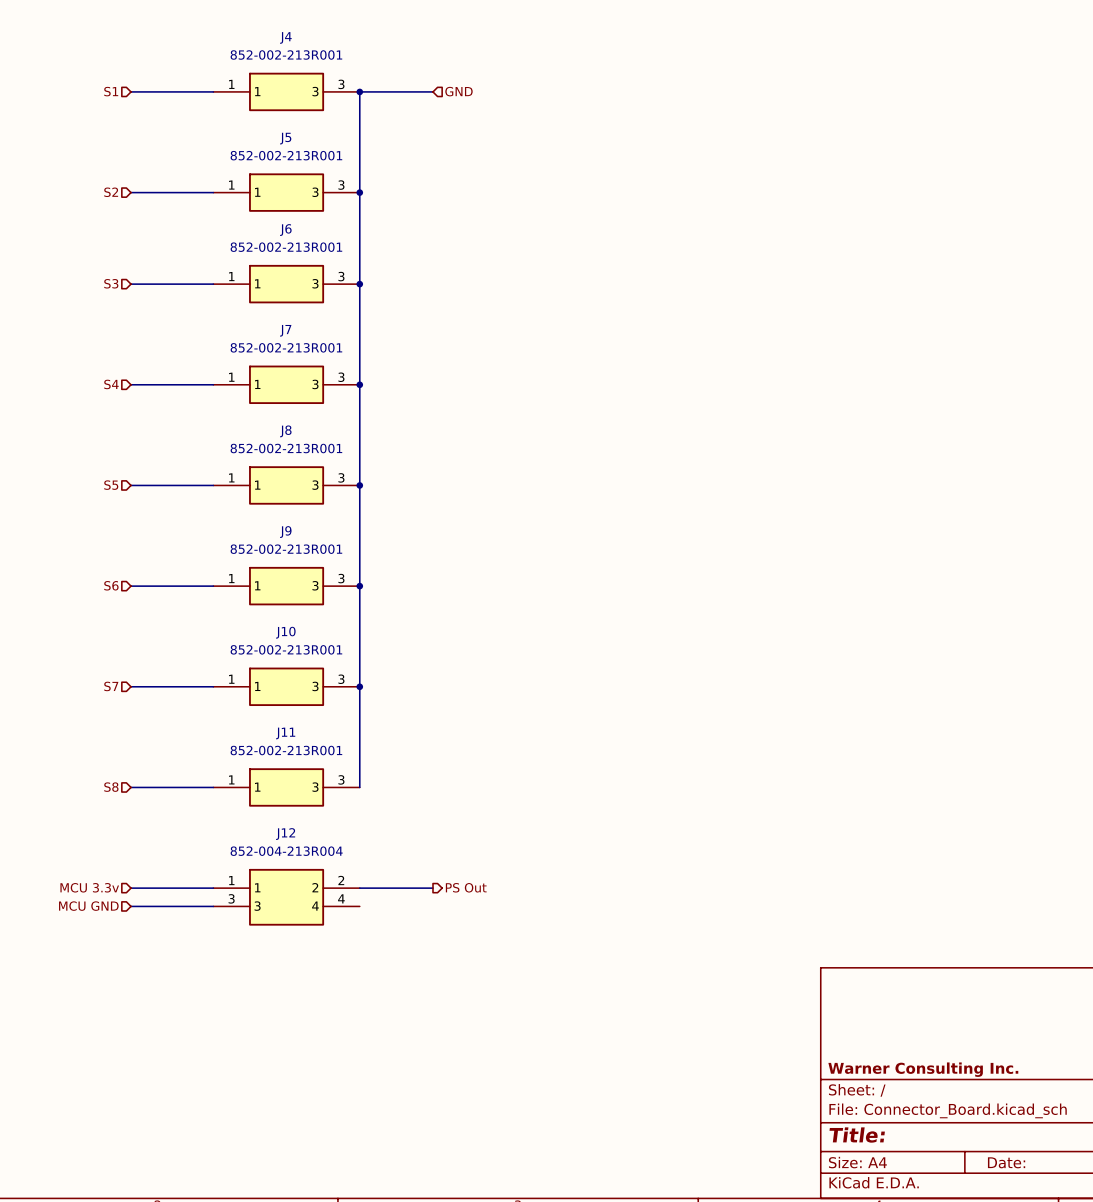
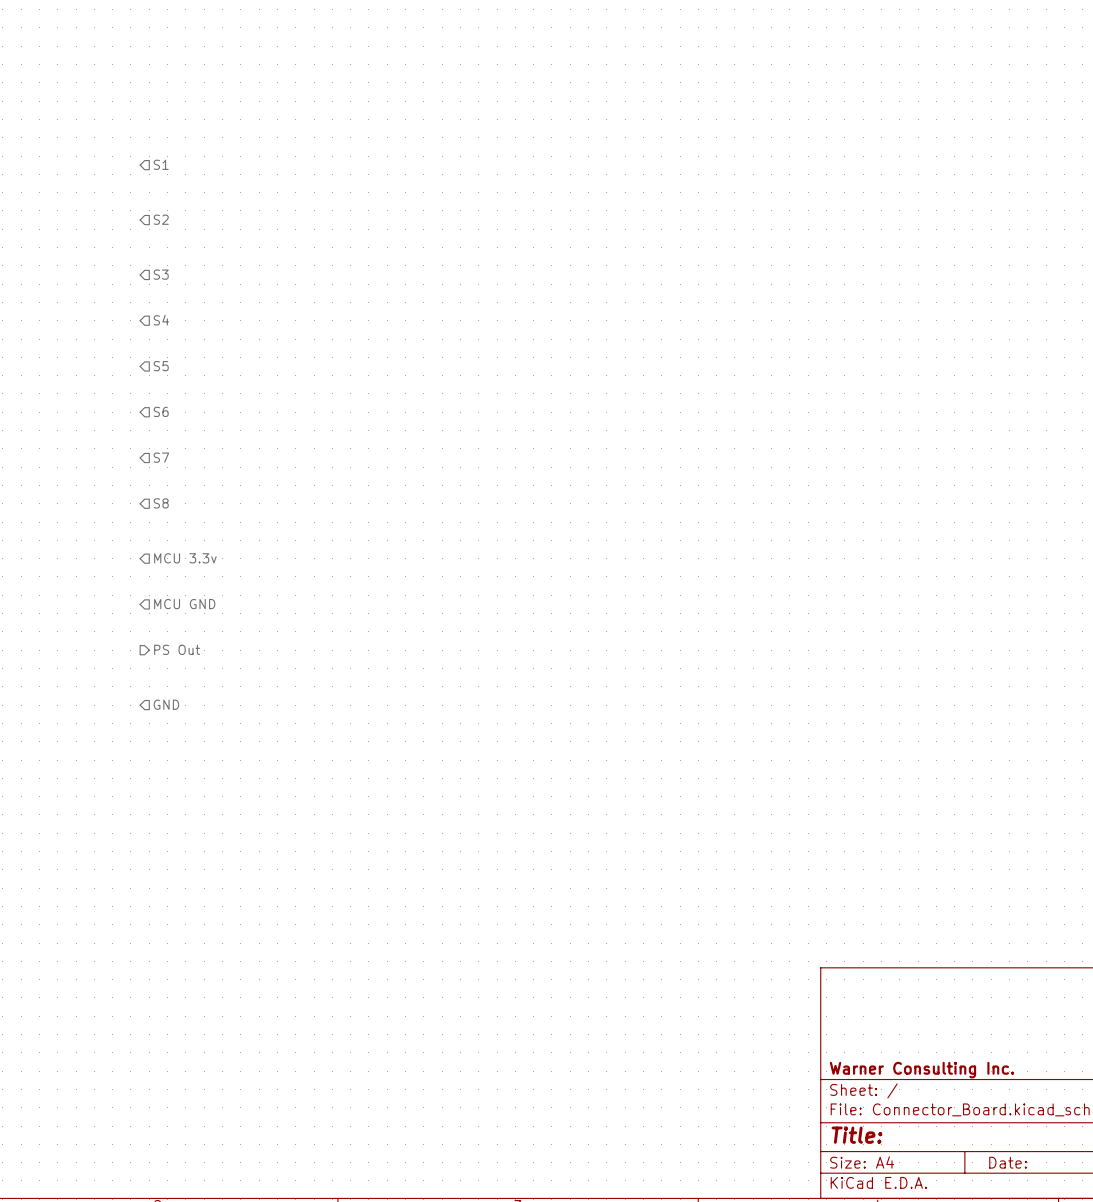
hierarchical label rotation: 0° (111, 91) -> 180° (161, 164)
hierarchical label position: S1 (111, 91) -> S1 (161, 164)
wire: (130, 91) (213, 91) -> none
J4: 852-002-213R001 (286, 91) -> none
junction: (359, 91) -> none
wire: (432, 91) (359, 91) (359, 787) -> none
hierarchical label: GND (458, 91) -> none
hierarchical label rotation: 0° (111, 192) -> 180° (161, 219)
hierarchical label position: S2 (111, 192) -> S2 (161, 219)
wire: (130, 192) (213, 192) -> none
J5: 852-002-213R001 (286, 192) -> none
junction: (359, 192) -> none
hierarchical label rotation: 0° (111, 283) -> 180° (161, 274)
hierarchical label position: S3 (111, 283) -> S3 (161, 274)
wire: (130, 284) (213, 284) -> none
J6: 852-002-213R001 (286, 284) -> none
junction: (359, 284) -> none
hierarchical label rotation: 0° (111, 384) -> 180° (161, 320)
hierarchical label position: S4 (111, 384) -> S4 (161, 320)
wire: (130, 384) (213, 384) -> none
J7: 852-002-213R001 (286, 384) -> none
junction: (359, 384) -> none
hierarchical label: none -> S7 (161, 457)
hierarchical label rotation: 0° (111, 485) -> 180° (161, 366)
hierarchical label position: S5 (111, 485) -> S5 (161, 366)
wire: (130, 485) (213, 485) -> none
J8: 852-002-213R001 (286, 485) -> none
junction: (359, 485) -> none
hierarchical label: none -> S8 (161, 503)
hierarchical label: none -> MCU 3.3v (185, 558)
hierarchical label rotation: 0° (111, 585) -> 180° (161, 411)
hierarchical label position: S6 (111, 585) -> S6 (161, 411)
wire: (130, 586) (213, 586) -> none
J9: 852-002-213R001 (286, 586) -> none
junction: (359, 586) -> none
hierarchical label: none -> MCU GND (184, 604)
hierarchical label: none -> PS Out (177, 649)
hierarchical label: S7 (111, 686) -> none
wire: (130, 686) (213, 686) -> none
J10: 852-002-213R001 (286, 686) -> none
junction: (359, 686) -> none
hierarchical label: none -> GND (166, 704)
hierarchical label: S8 (111, 787) -> none
wire: (130, 787) (213, 787) -> none
J11: 852-002-213R001 (286, 787) -> none
hierarchical label: MCU 3.3v (89, 887) -> none
hierarchical label: PS Out (466, 887) -> none
wire: (130, 888) (213, 888) -> none
wire: (359, 888) (432, 888) -> none
J12: 852-004-213R004 (286, 897) -> none
hierarchical label: MCU GND (88, 906) -> none
wire: (130, 906) (213, 906) -> none

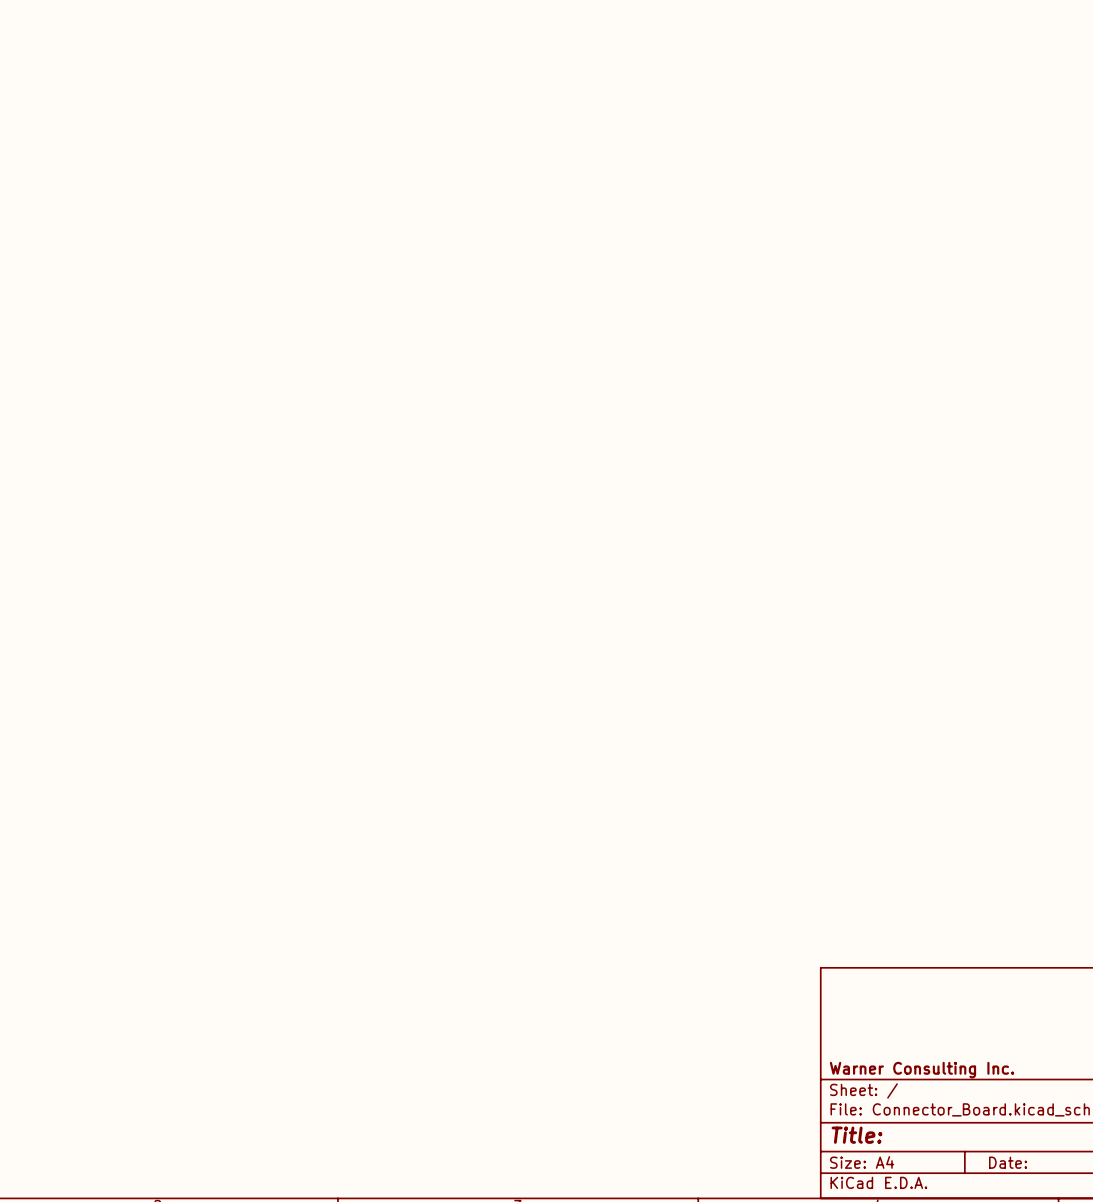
hierarchical label: S1 (161, 164) -> none
hierarchical label: S2 (161, 219) -> none
hierarchical label: S3 (161, 274) -> none
hierarchical label: S4 (161, 320) -> none
hierarchical label: S5 (161, 366) -> none
hierarchical label: S6 (161, 411) -> none
hierarchical label: S7 (161, 457) -> none
hierarchical label: S8 (161, 503) -> none
hierarchical label: MCU 3.3v (185, 558) -> none
hierarchical label: MCU GND (184, 604) -> none
hierarchical label: PS Out (177, 649) -> none
hierarchical label: GND (166, 704) -> none

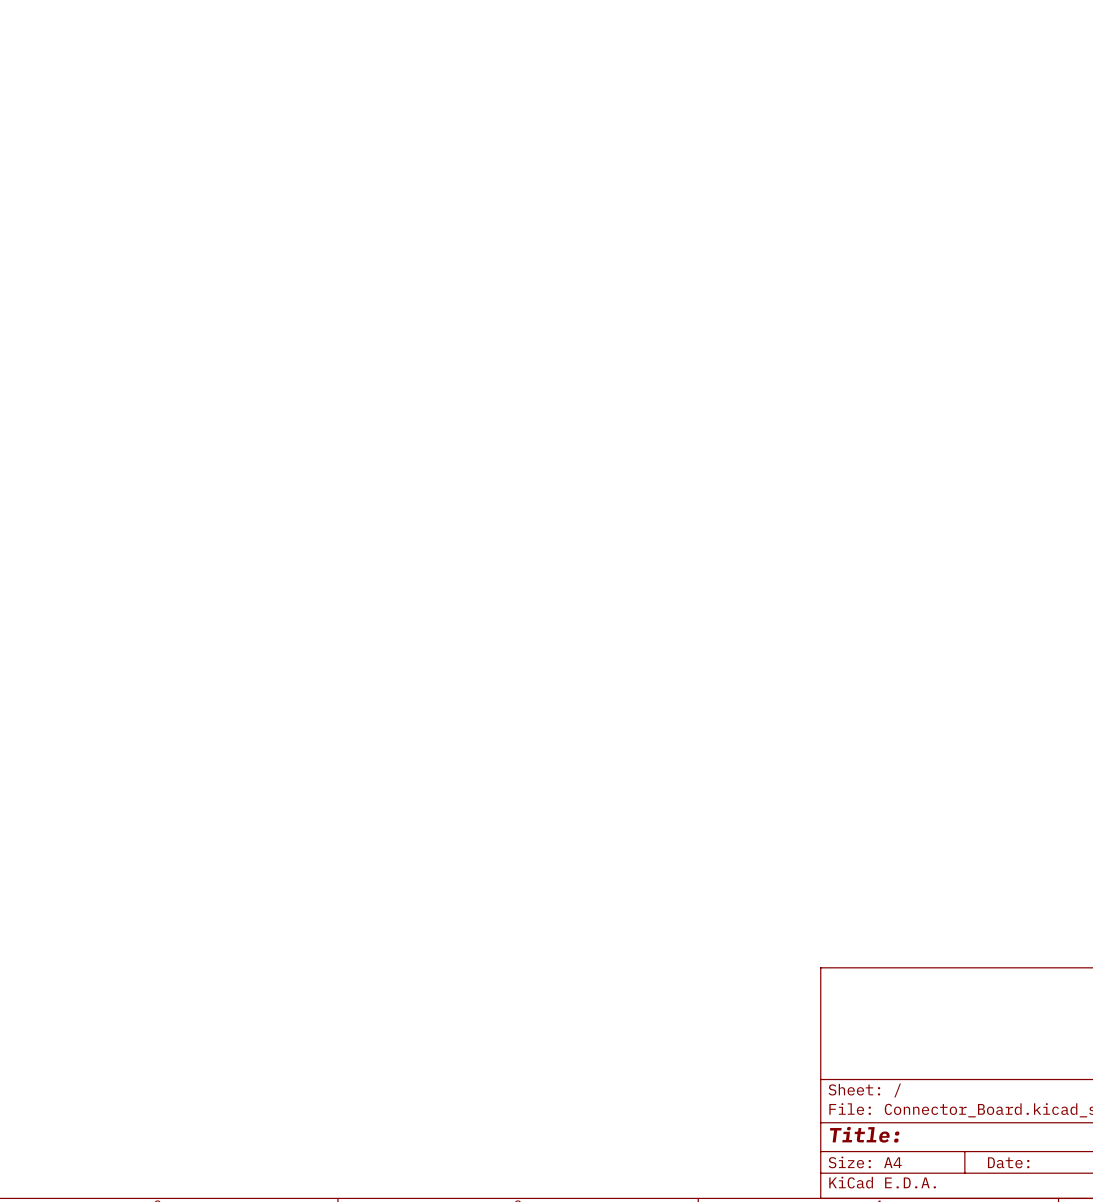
title block: Warner Consulting Inc. (922, 1070) -> none

